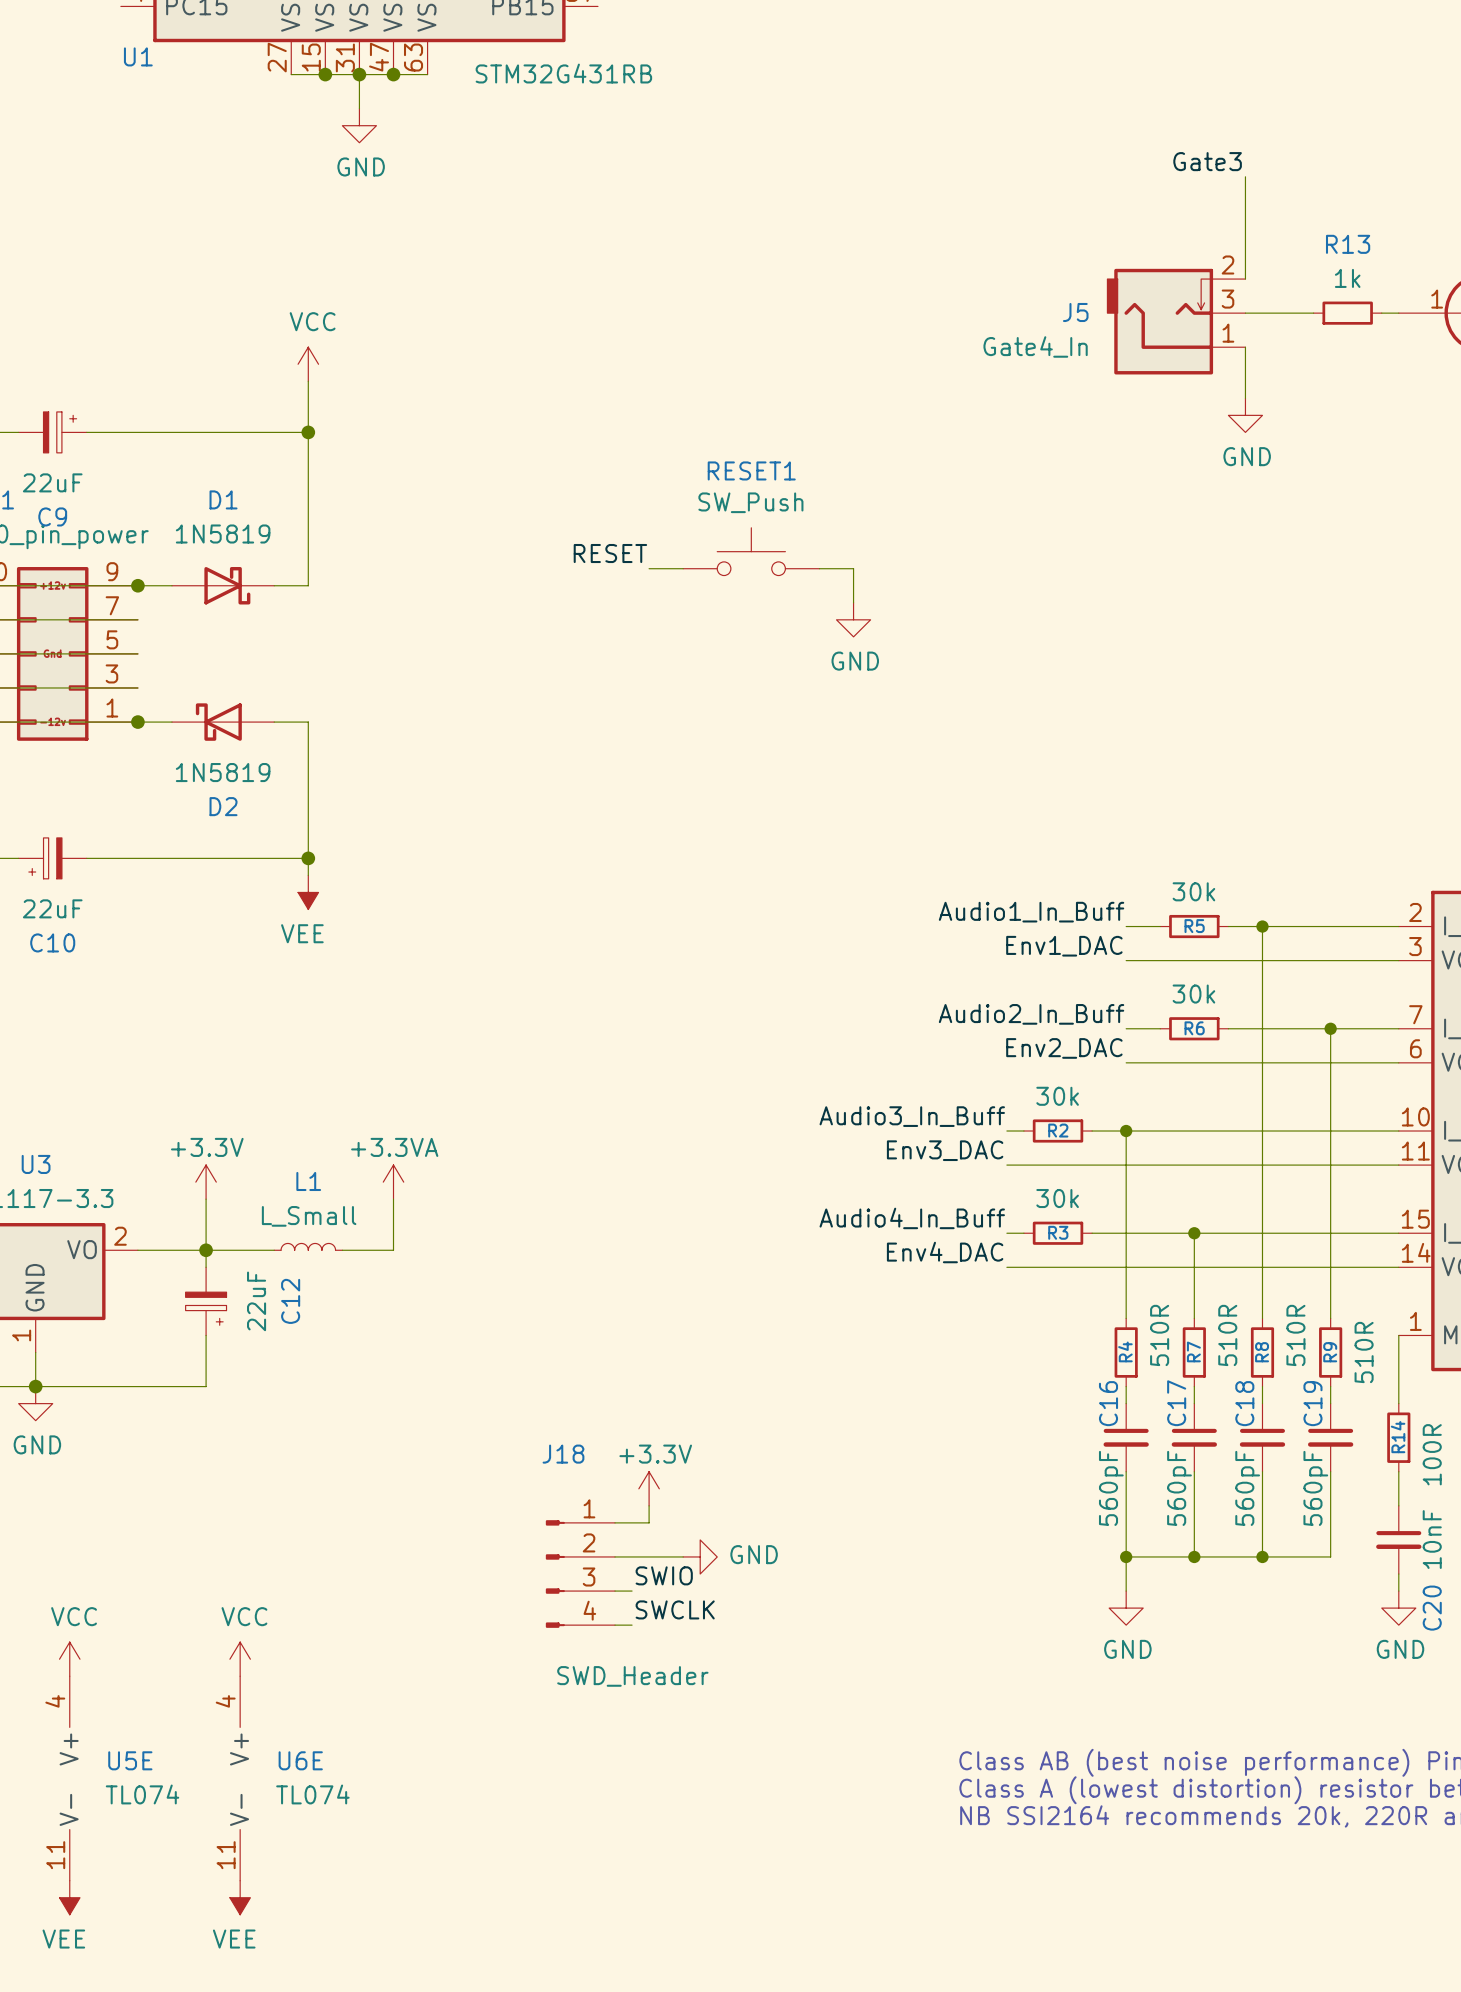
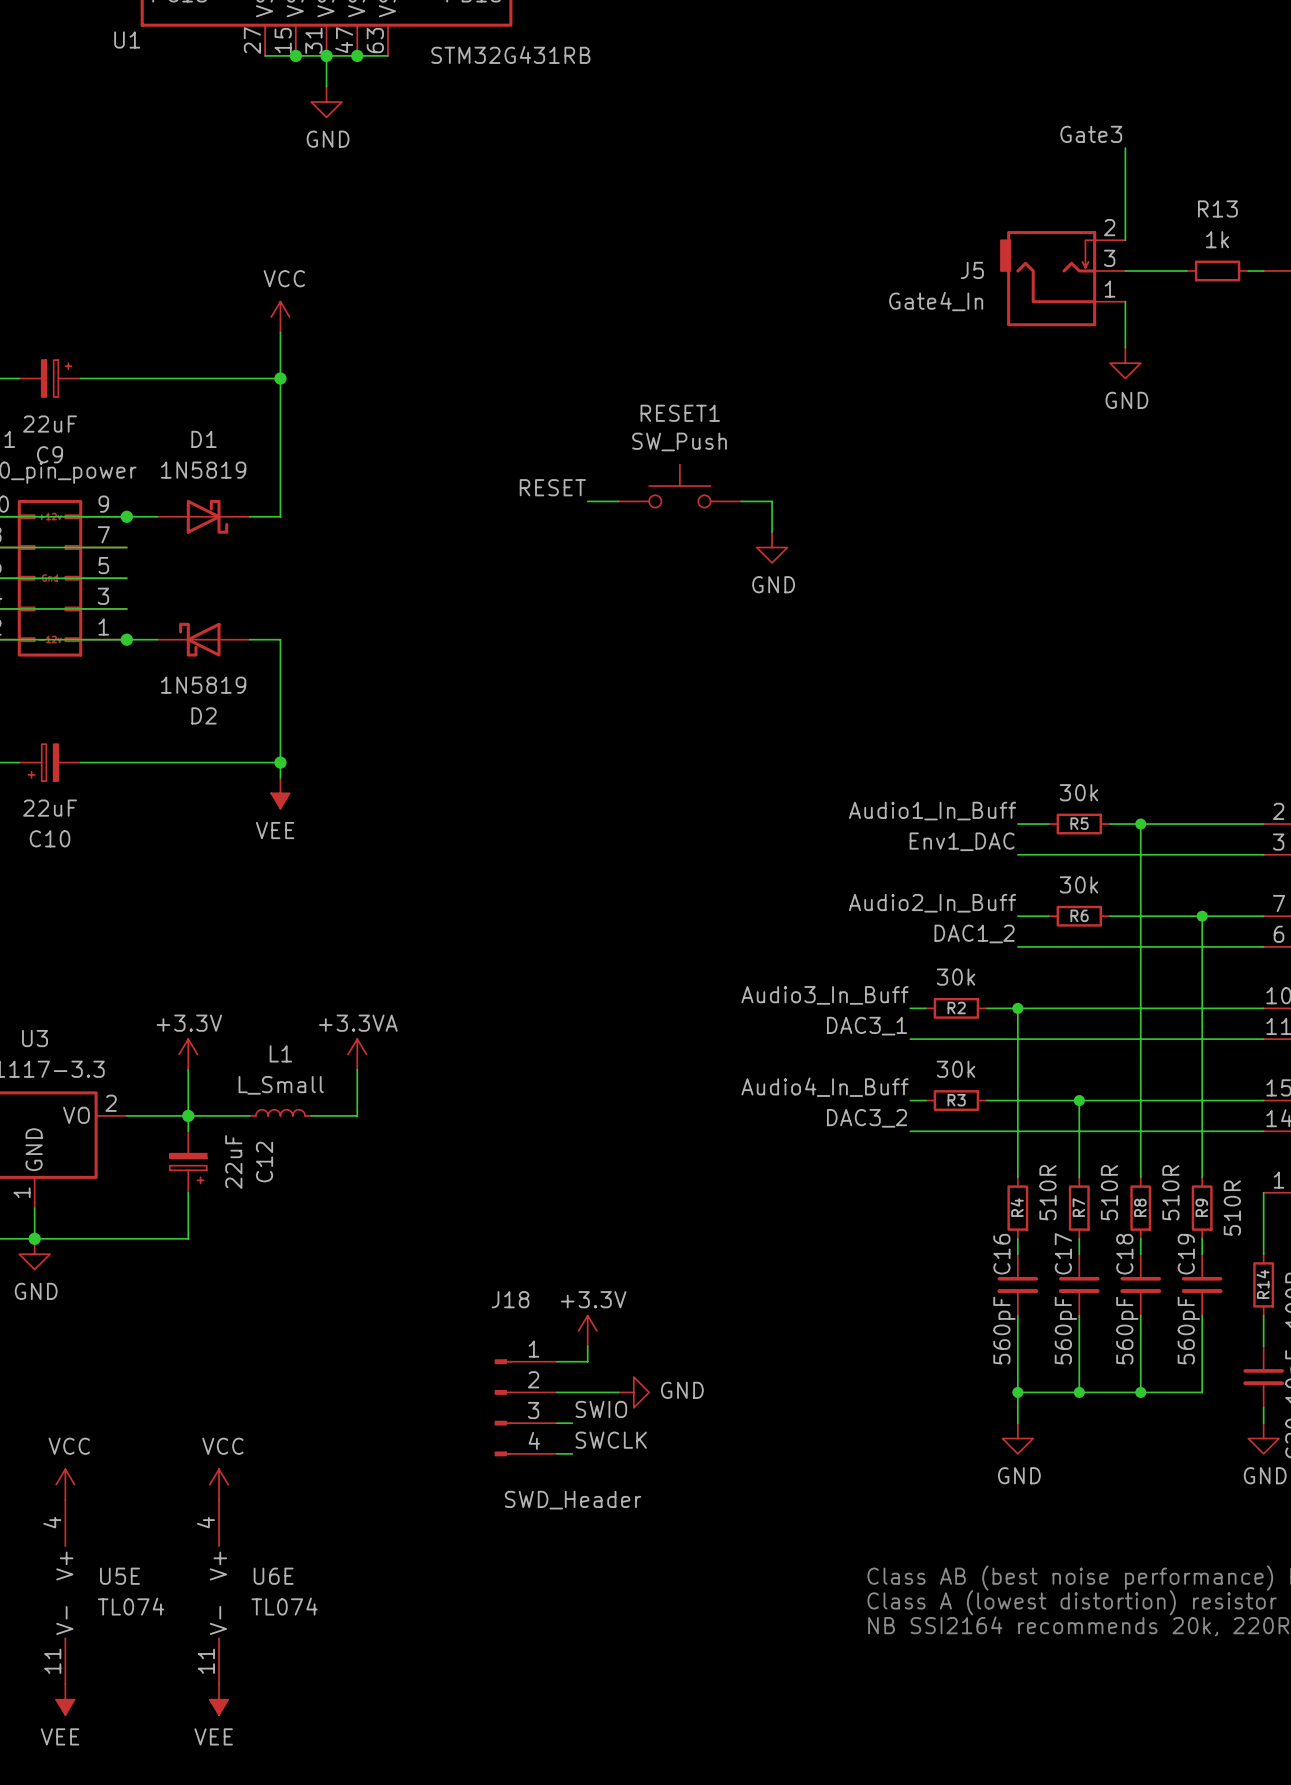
label: Env2_DAC (1064, 1048) -> DAC1_2 (974, 933)
label: Env3_DAC (945, 1150) -> DAC3_1 (867, 1026)
label: Env4_DAC (945, 1252) -> DAC3_2 (867, 1118)

